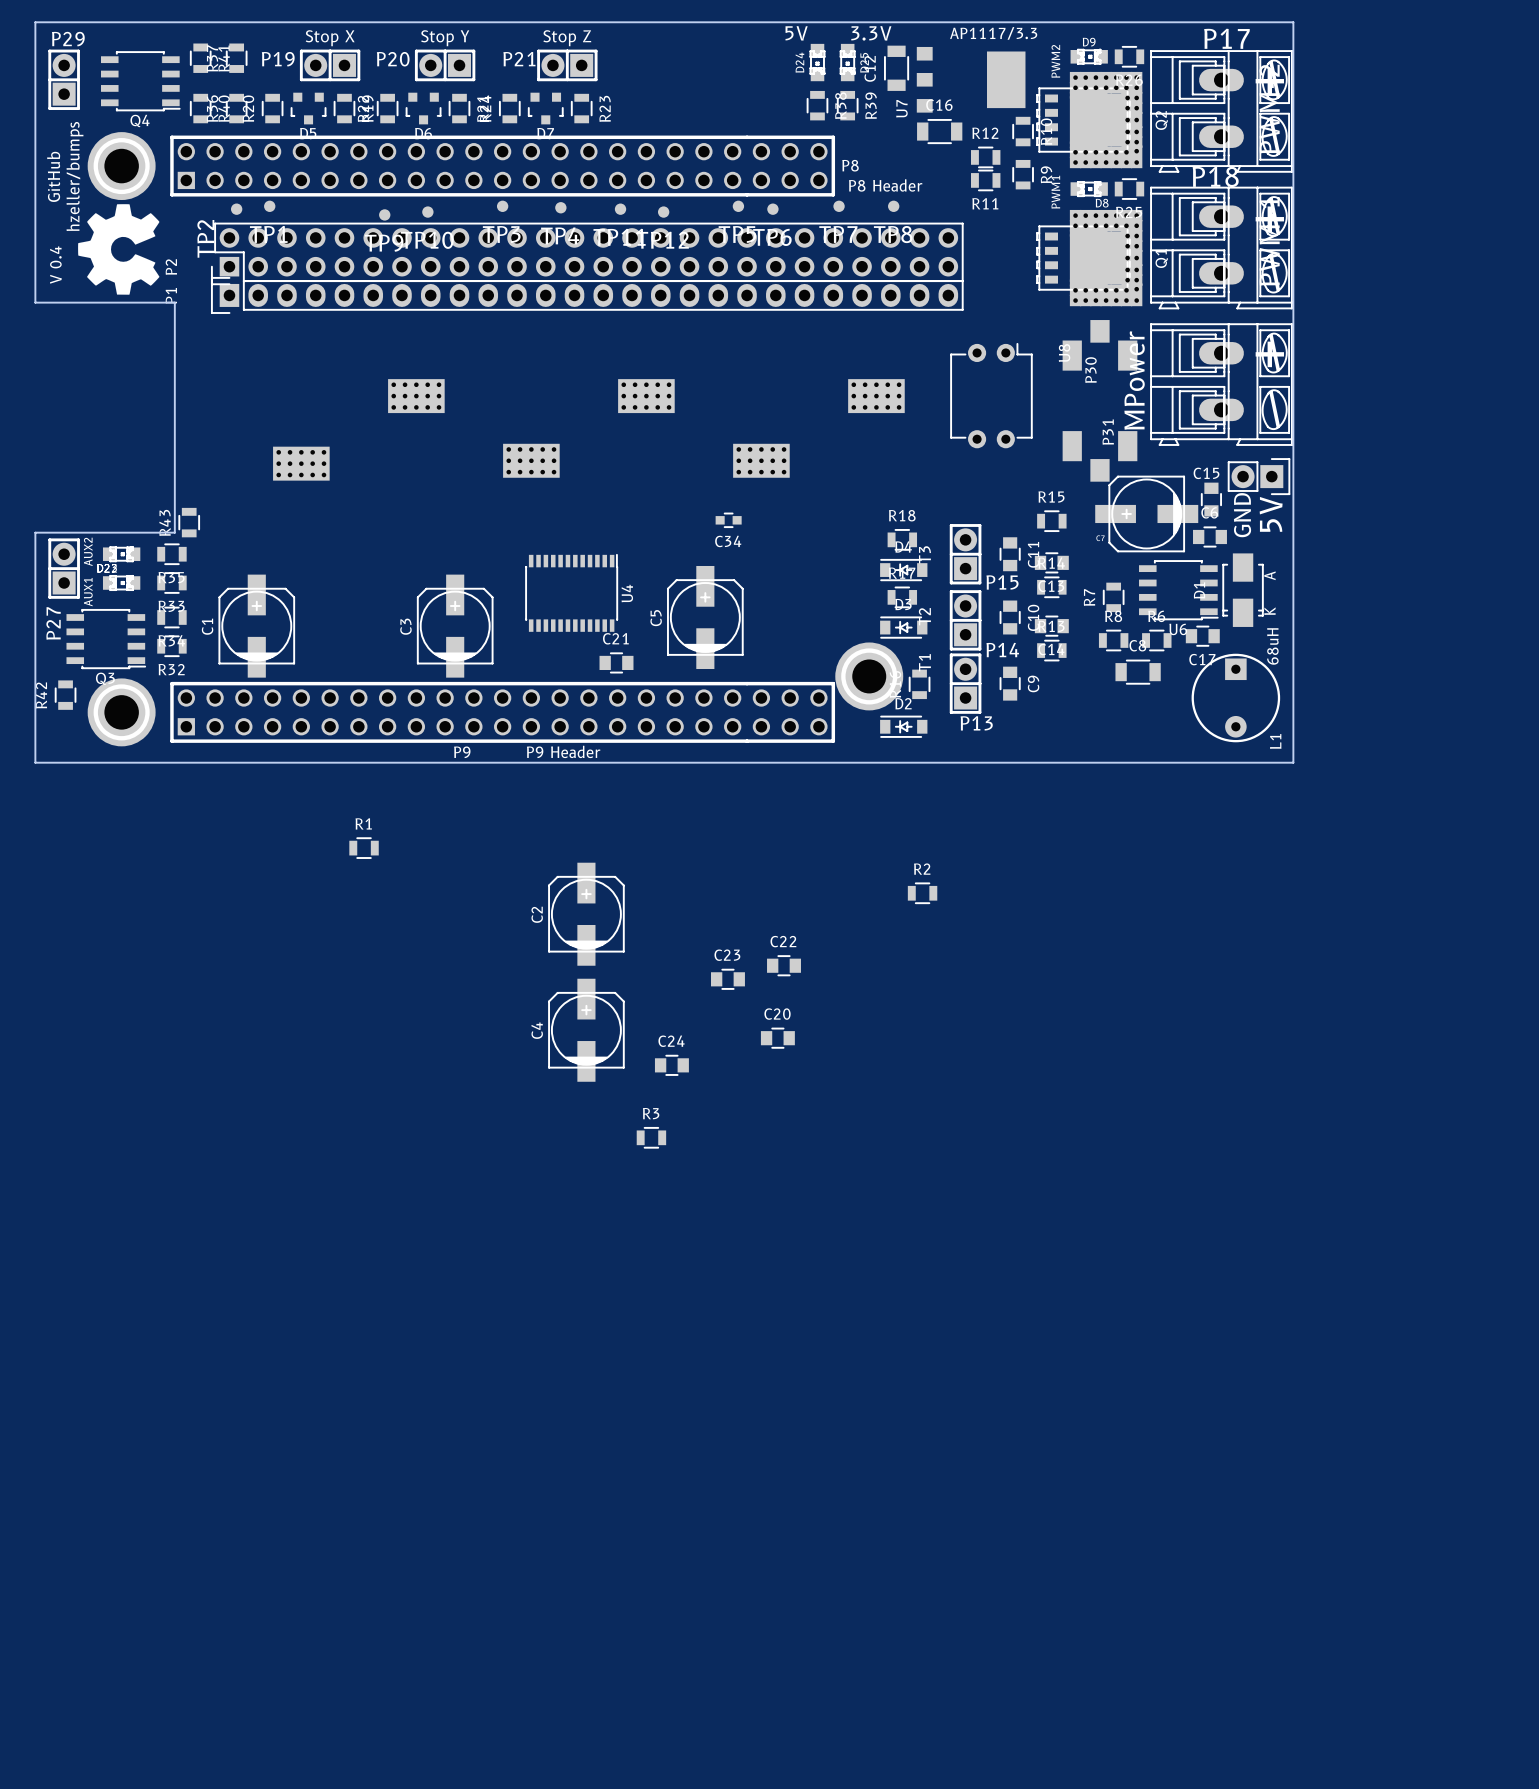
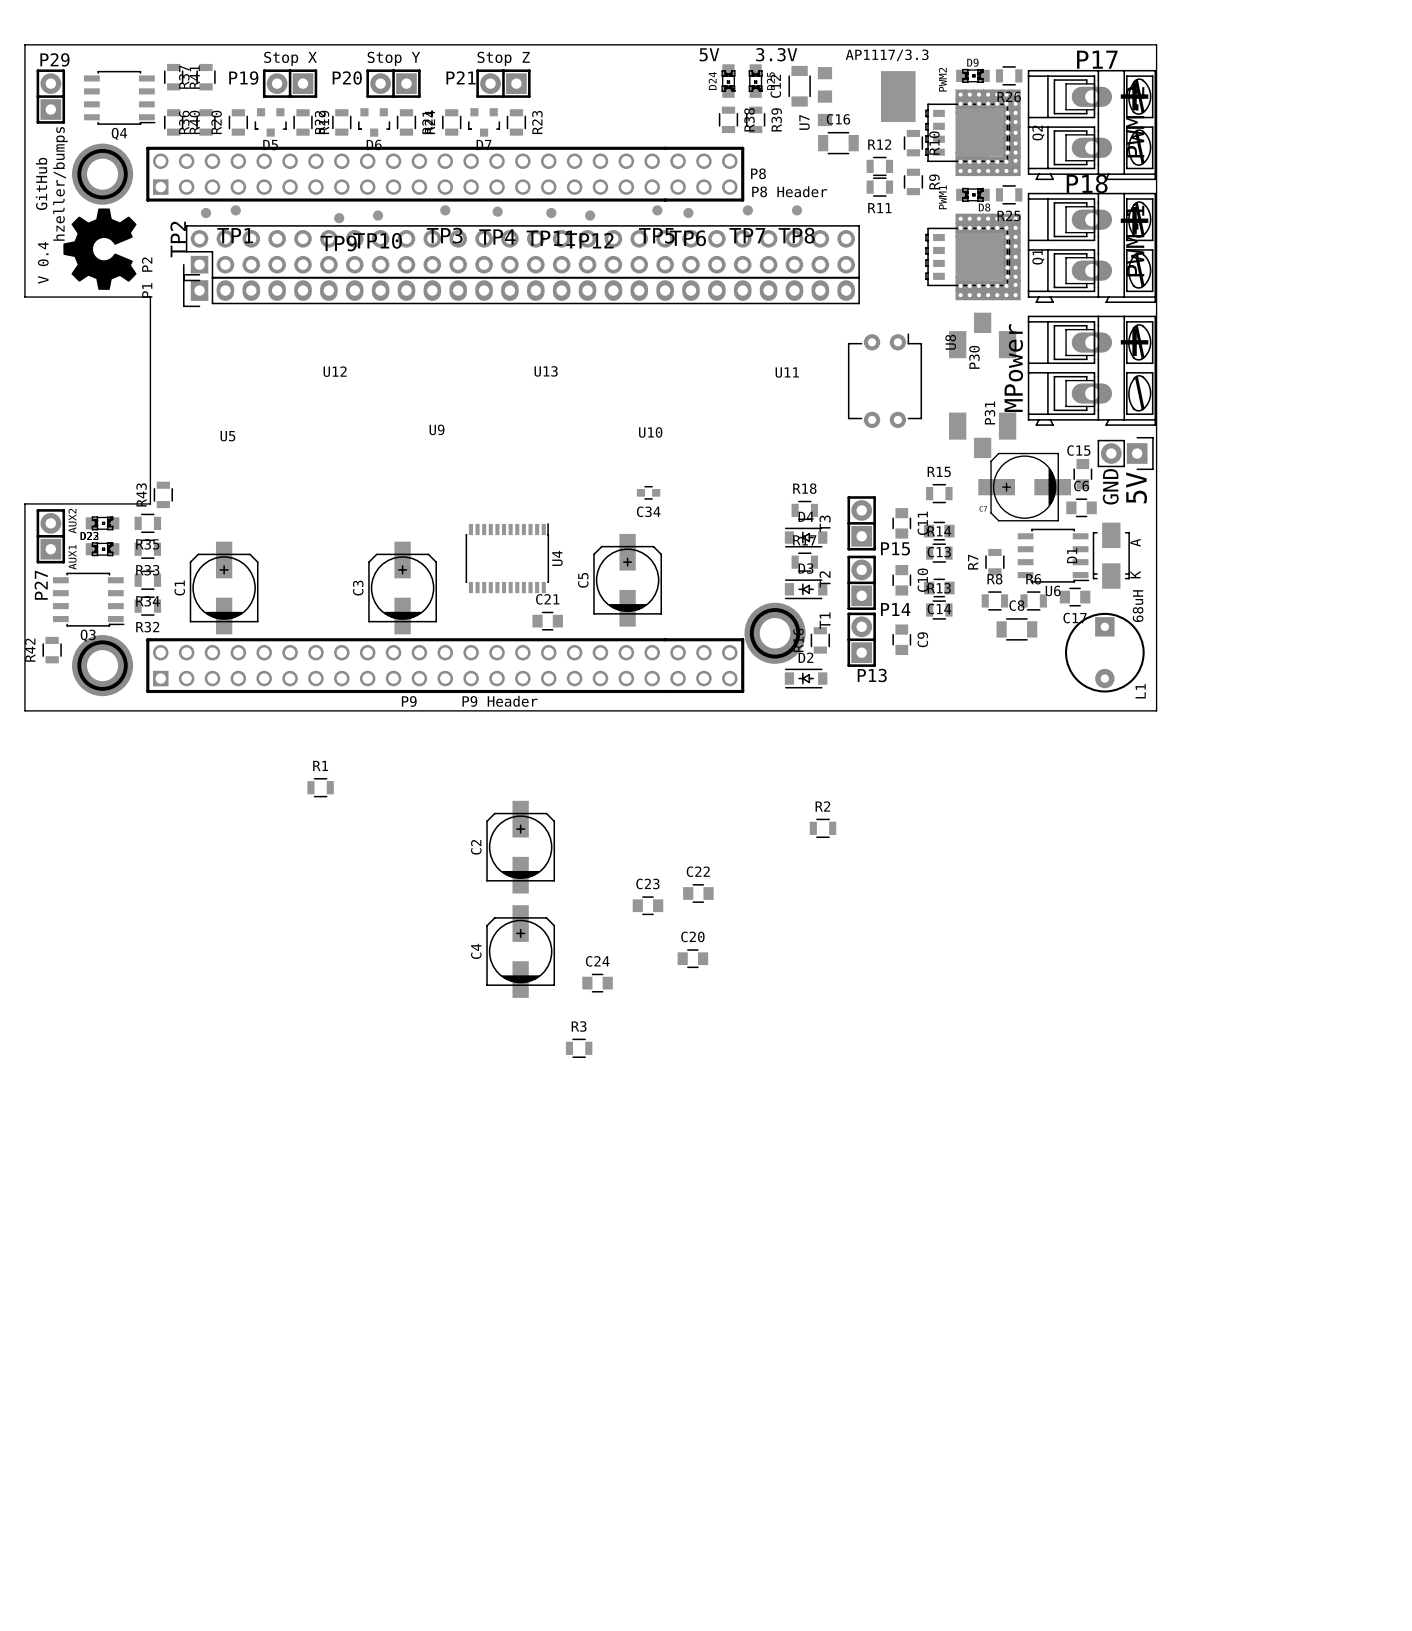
U12: none -> (335, 371)
U13: none -> (546, 371)
U11: none -> (787, 372)
part: (416, 396) -> none
part: (646, 396) -> none
part: (876, 396) -> none
U9: none -> (437, 429)
U10: none -> (650, 432)
U5: none -> (227, 436)
part: (531, 460) -> none
part: (761, 460) -> none
part: (301, 463) -> none

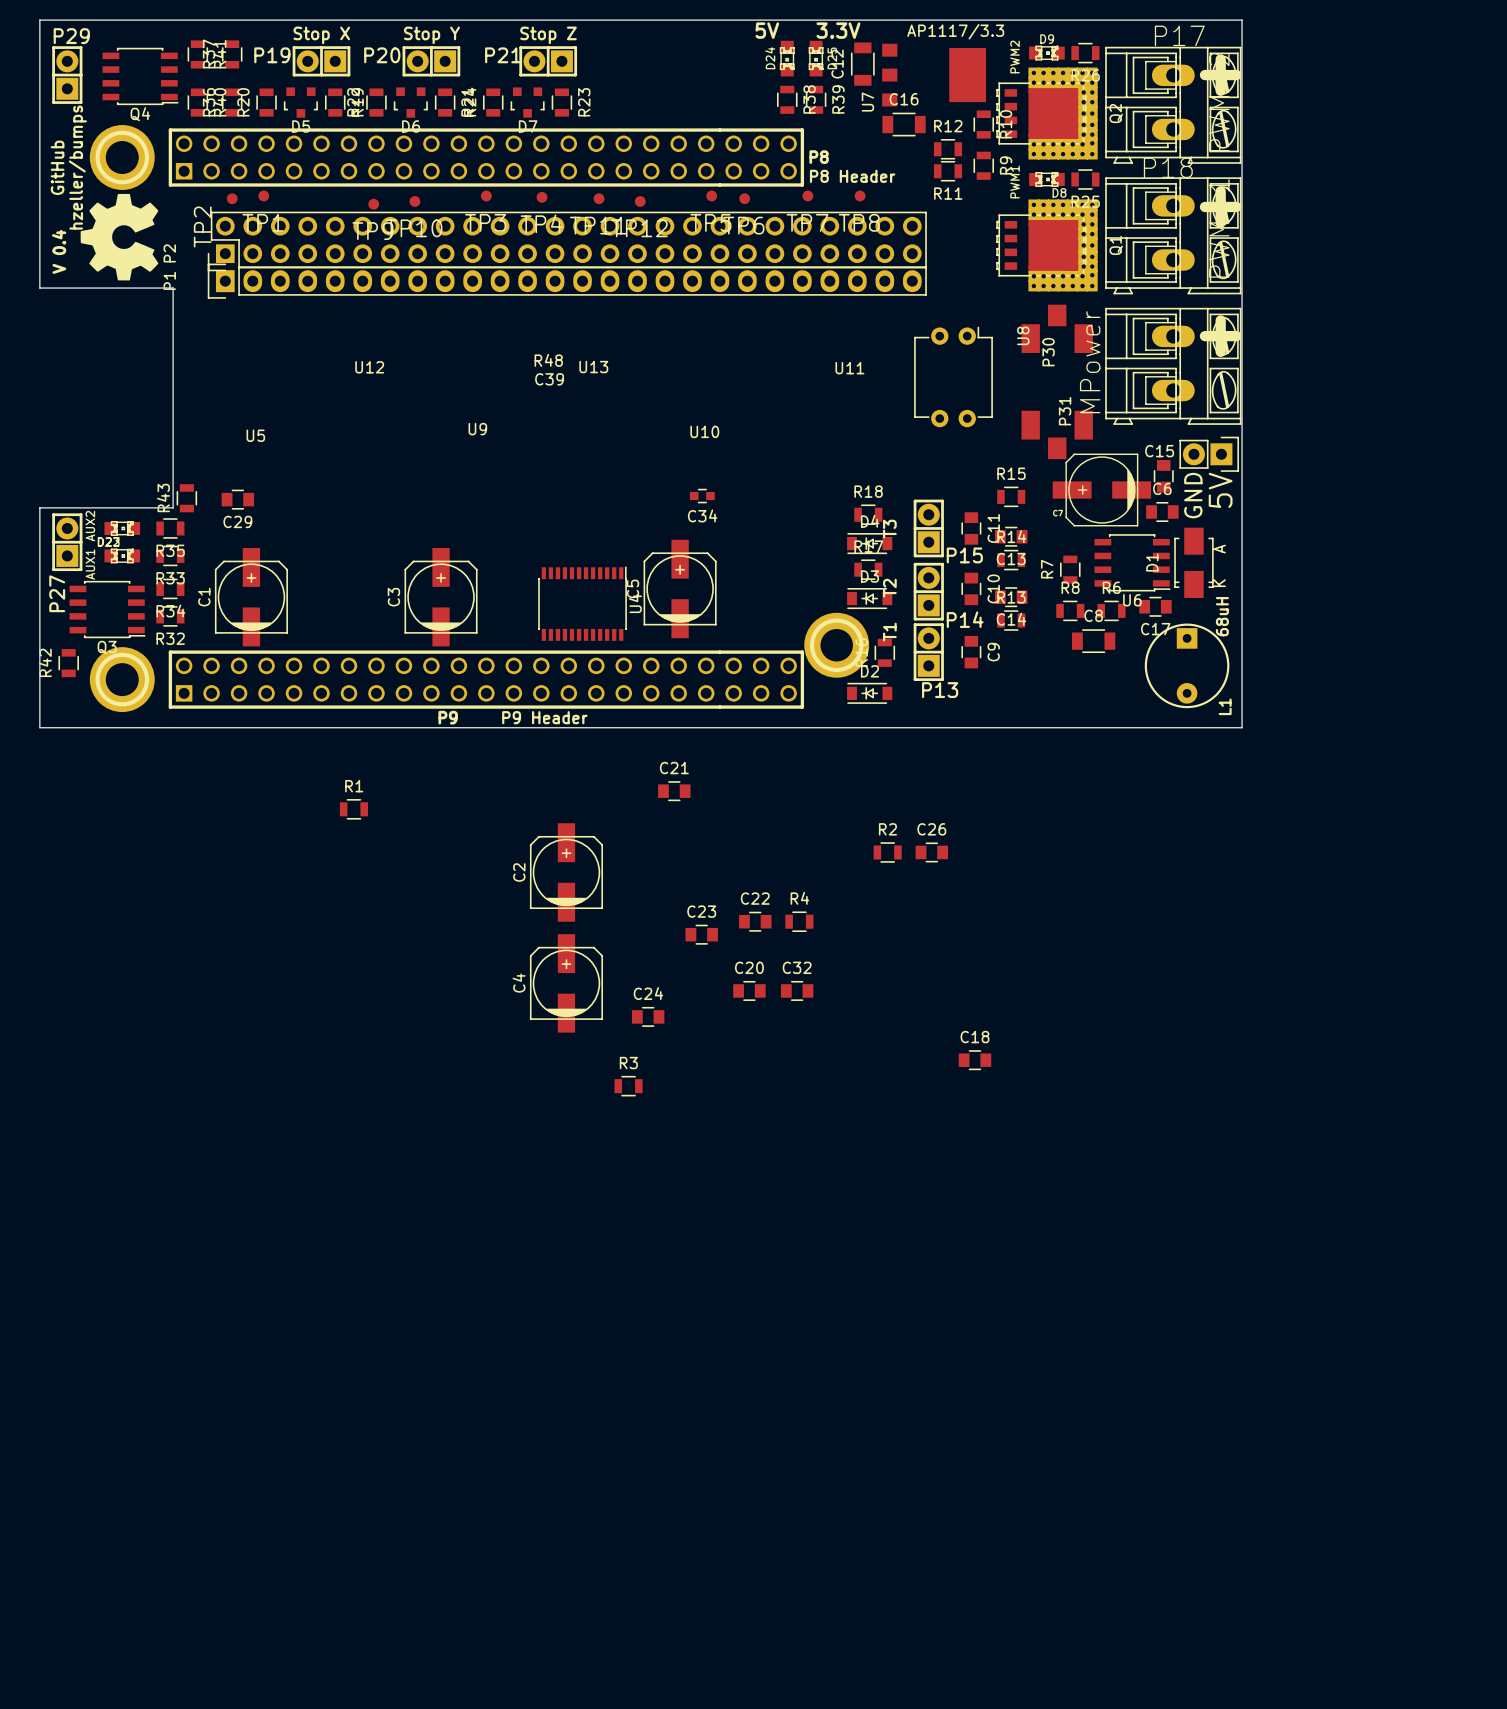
R48: none -> (548, 360)
C39: none -> (549, 379)
C29: none -> (237, 499)
U4 position: (507, 558) -> (582, 603)
C21 position: (547, 621) -> (674, 791)
C26: none -> (931, 852)
R4: none -> (799, 921)
C32: none -> (797, 990)
C18: none -> (974, 1060)

